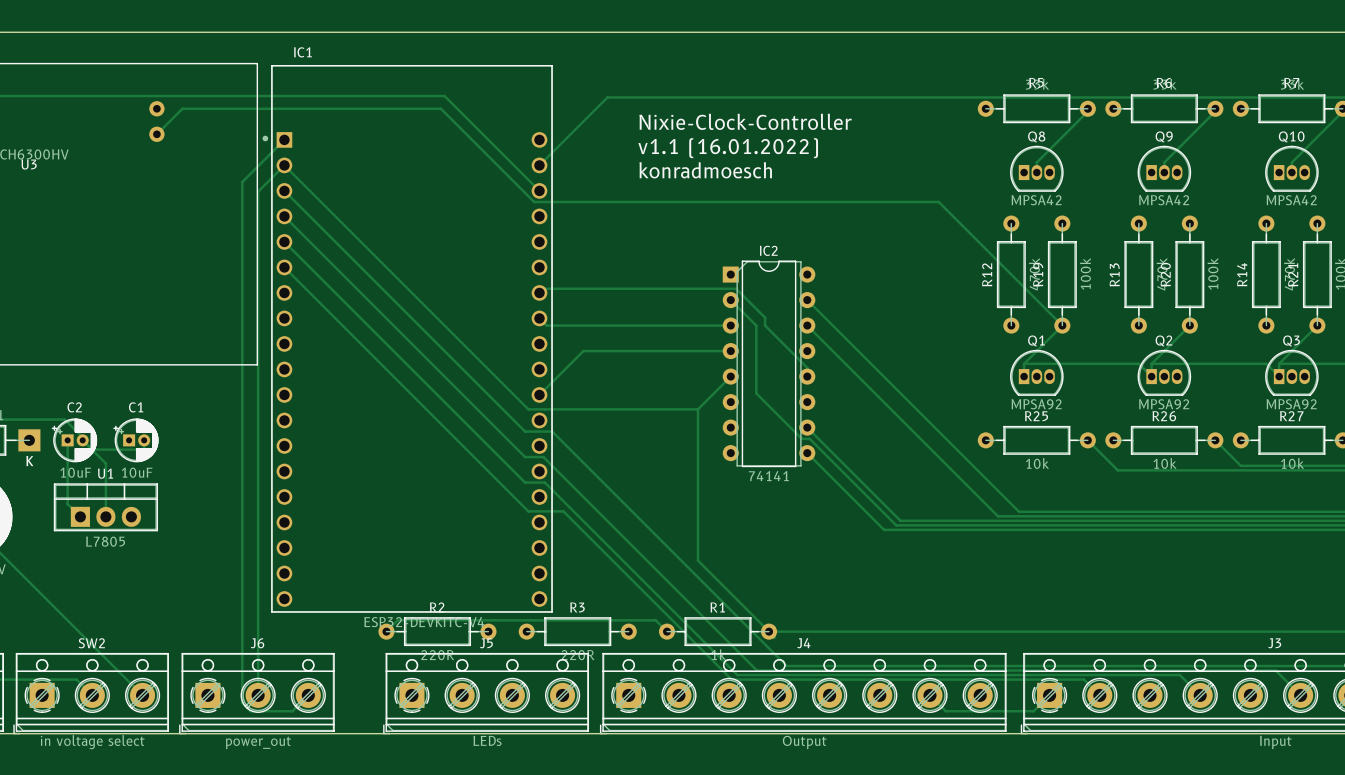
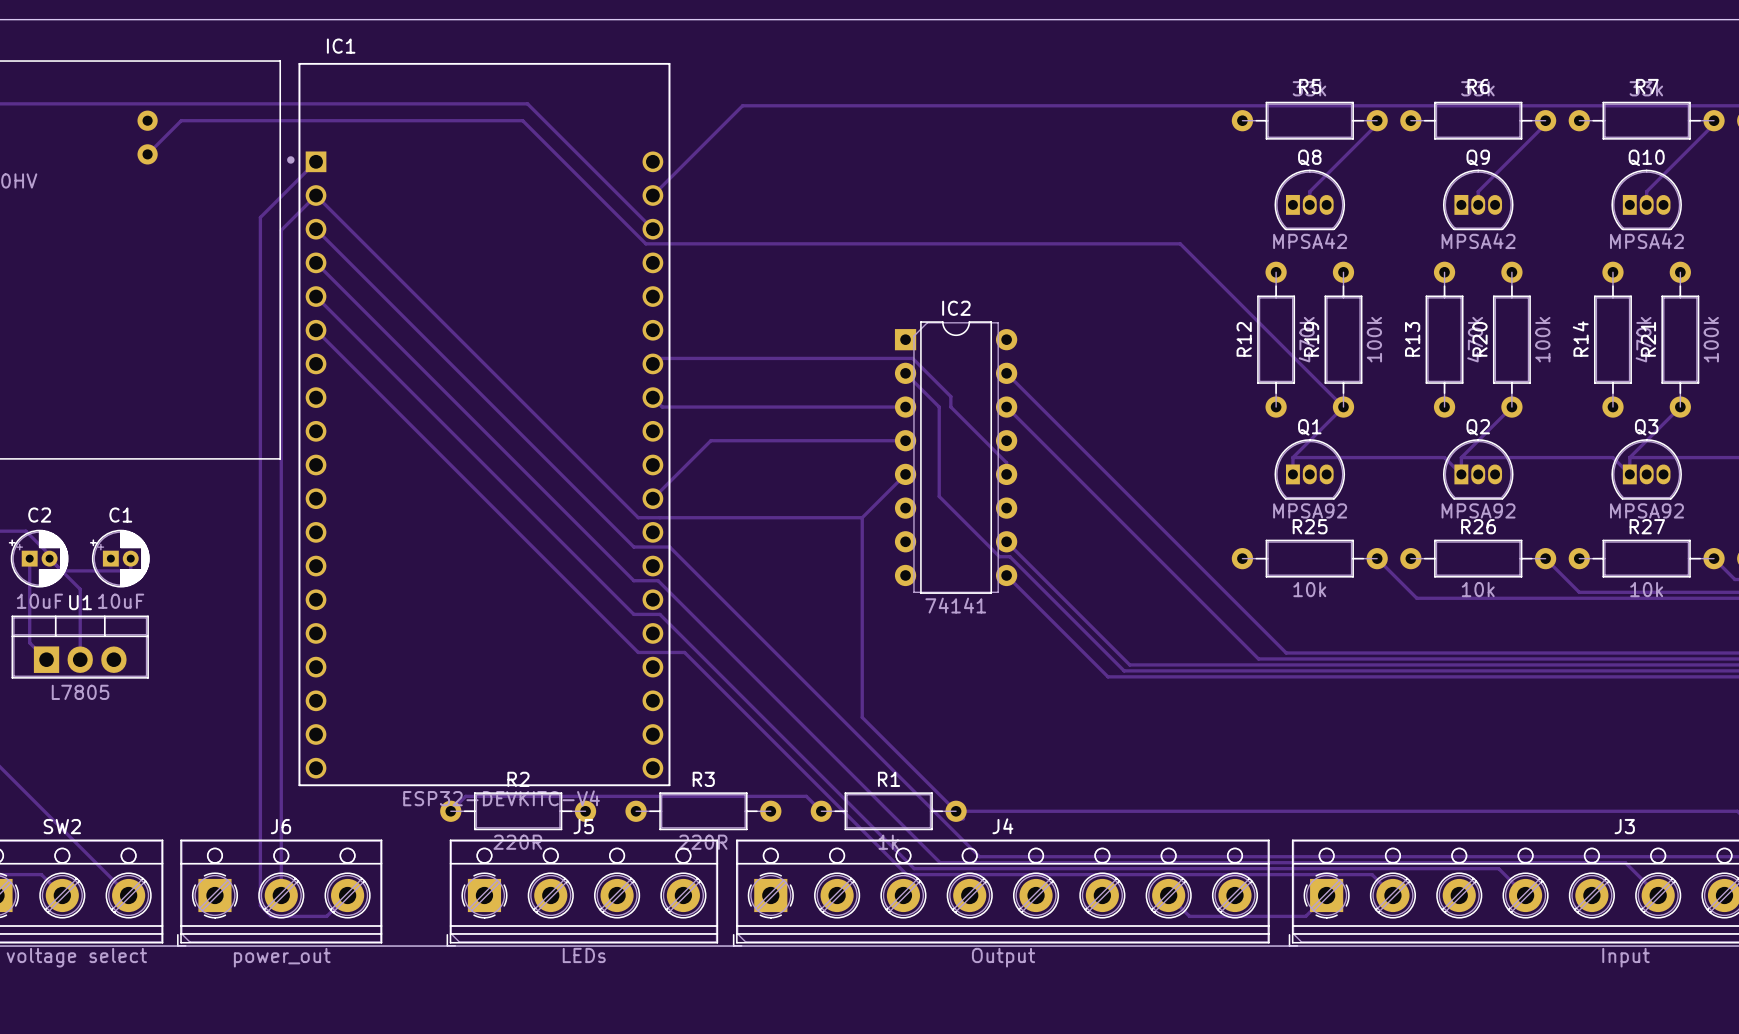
text: Nixie-Clock-Controller (745, 121) -> none
text: v1.1 (16.01.2022) (728, 148) -> none
text: konradmoesch (705, 170) -> none

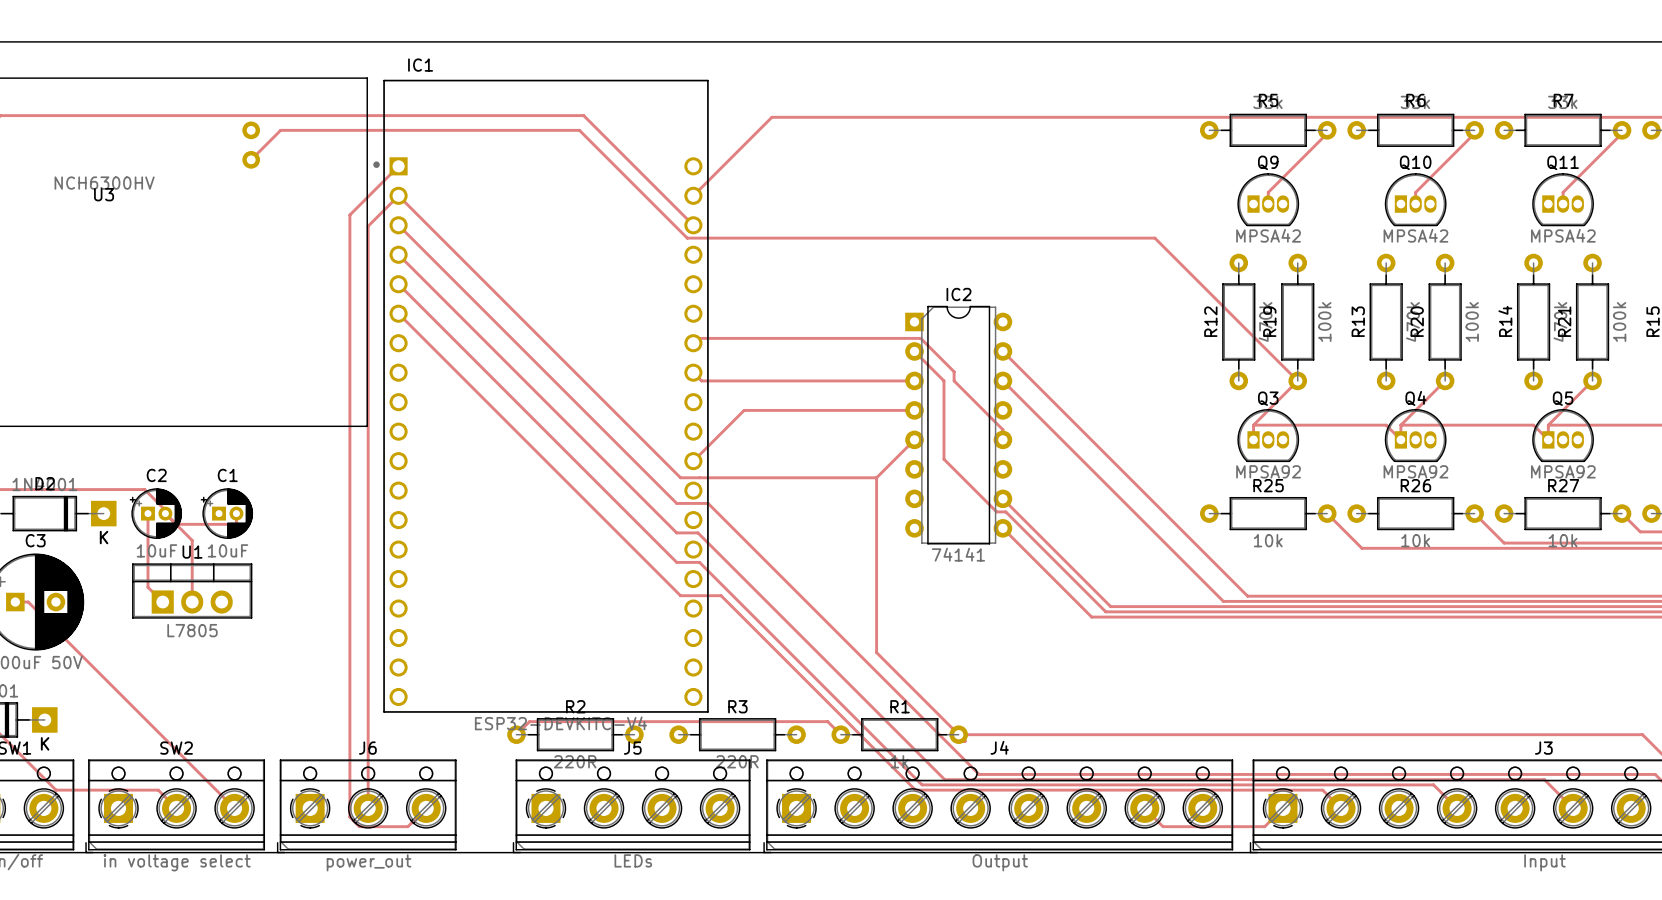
Q8 name: Q8 (1309, 157) -> Q9 (1268, 162)
Q9 name: Q9 (1478, 157) -> Q10 (1415, 162)
Q10 name: Q10 (1646, 157) -> Q11 (1563, 162)
Q1 name: Q1 (1309, 427) -> Q3 (1268, 398)
Q2 name: Q2 (1478, 427) -> Q4 (1415, 398)
Q3 name: Q3 (1646, 427) -> Q5 (1563, 398)

